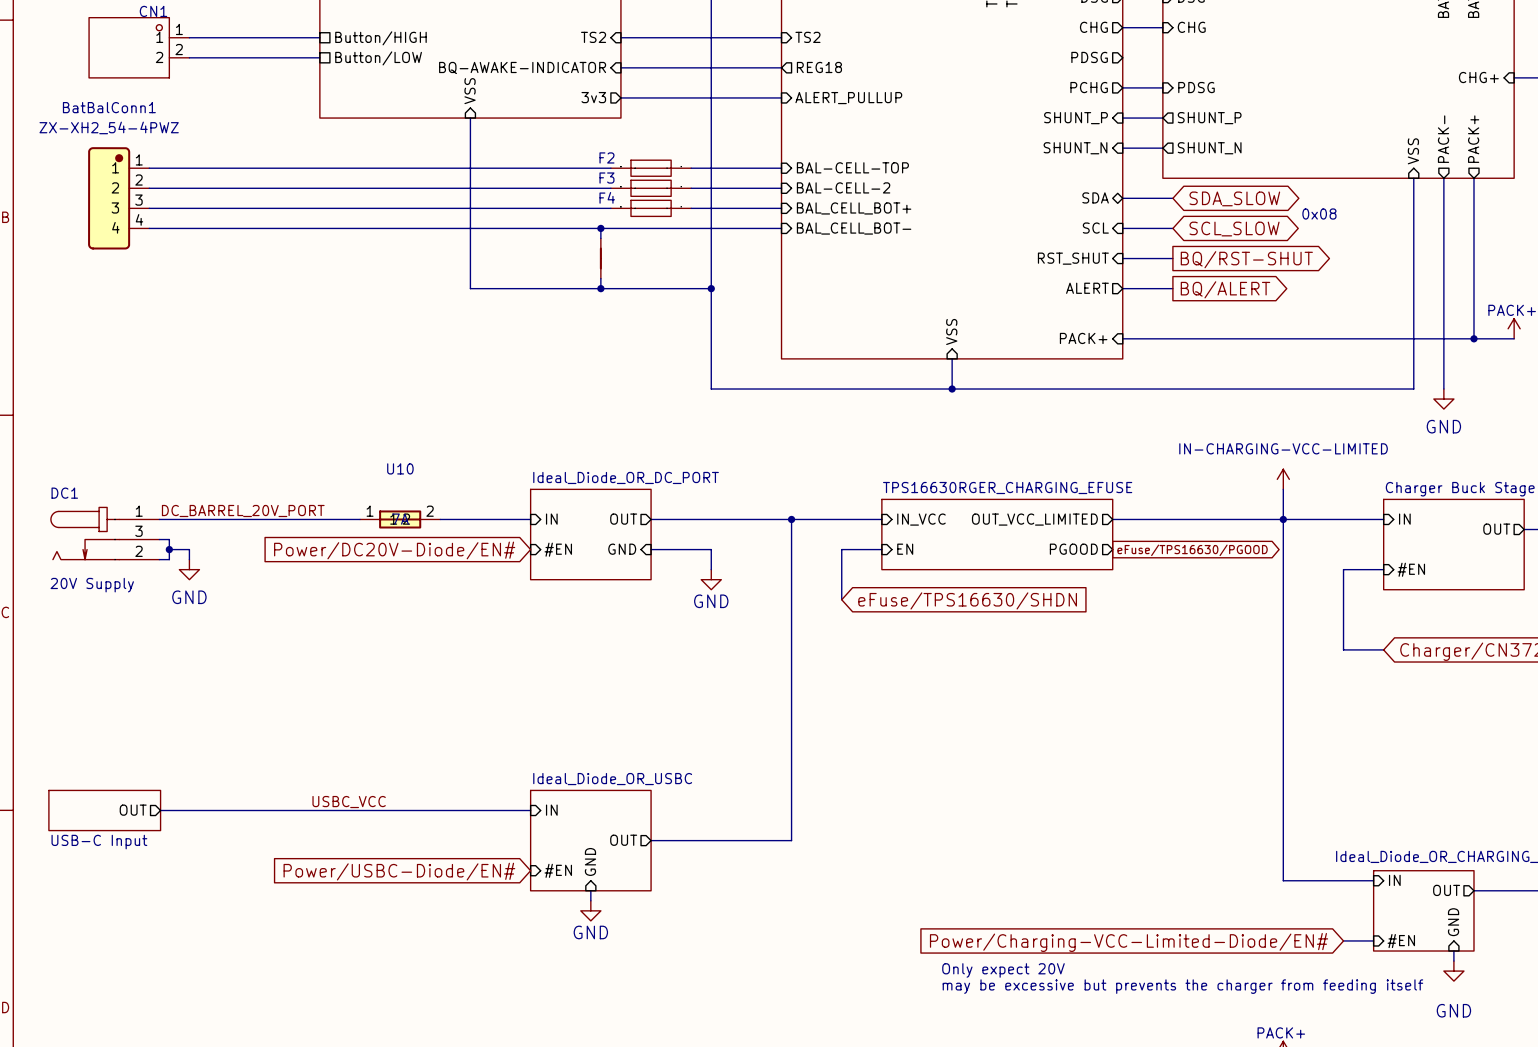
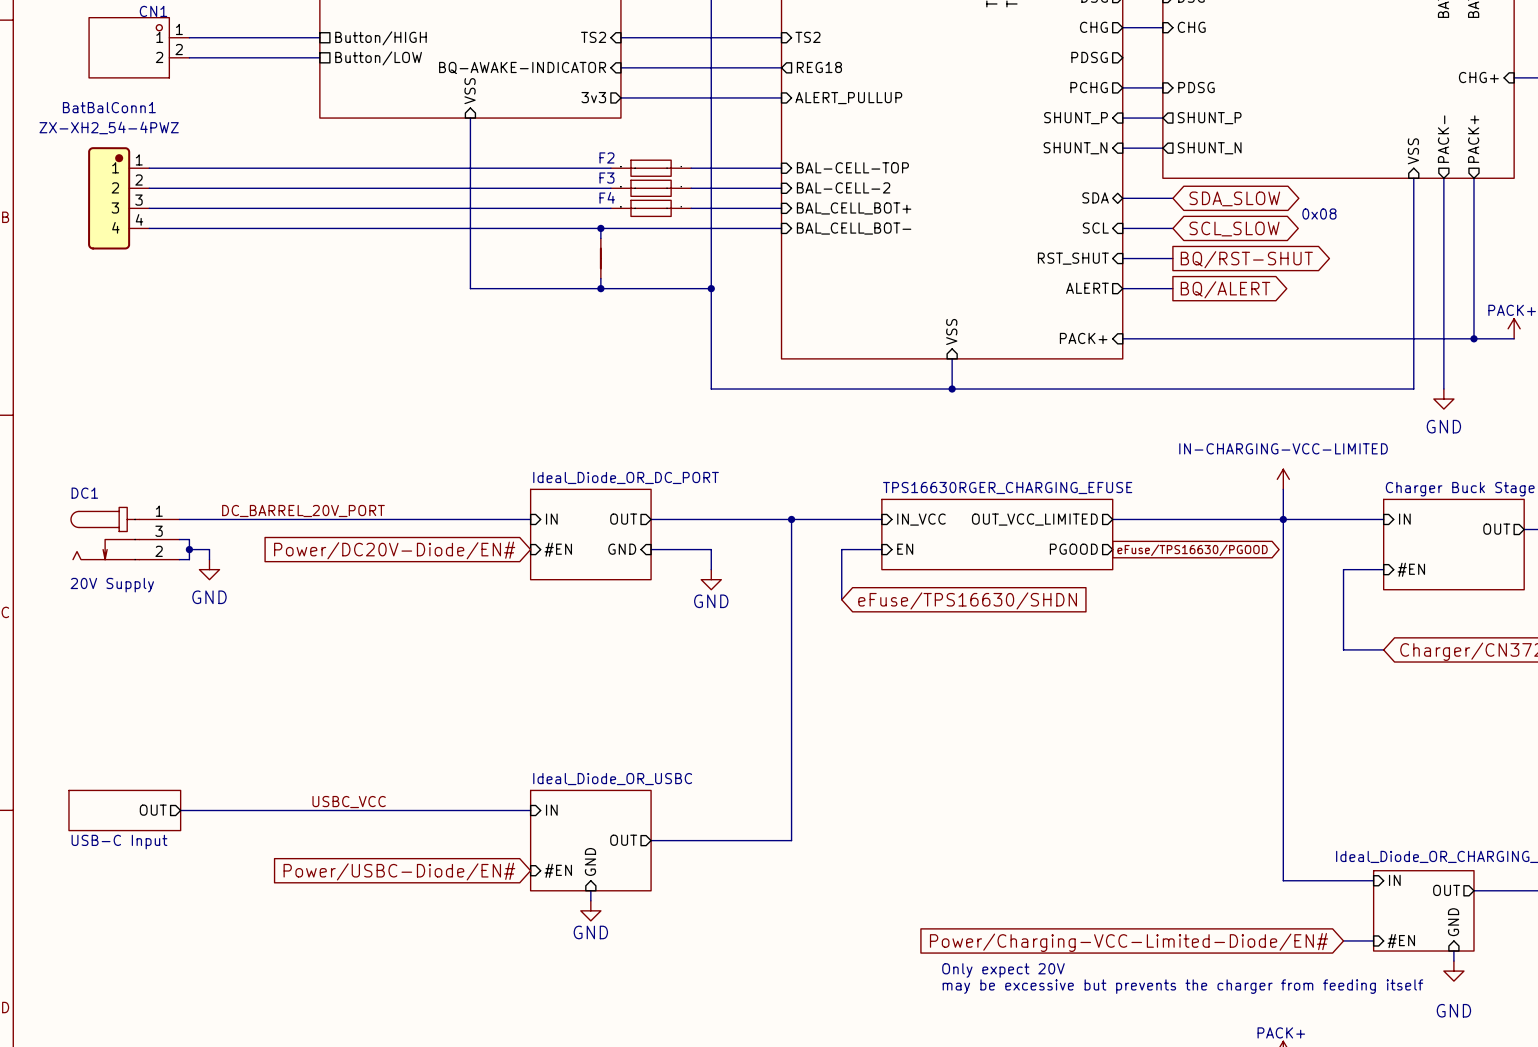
label position: DC_BARREL_20V_PORT (243, 510) -> DC_BARREL_20V_PORT (303, 510)
U10: (400, 519) -> none
DC1 position: (105, 533) -> (125, 533)
wire: none -> (179, 539) (189, 539) (189, 549) (209, 549) (209, 559)
wire: (169, 549) (189, 549) -> none
junction position: (169, 549) -> (189, 549)
wire: none -> (179, 559) (189, 559)
power symbol position: GND (189, 569) -> GND (209, 569)
sheet USB-C Input position: (104, 810) -> (124, 810)
sheet pin position: OUT (133, 810) -> OUT (153, 810)
wire: (160, 810) (180, 810) -> none

